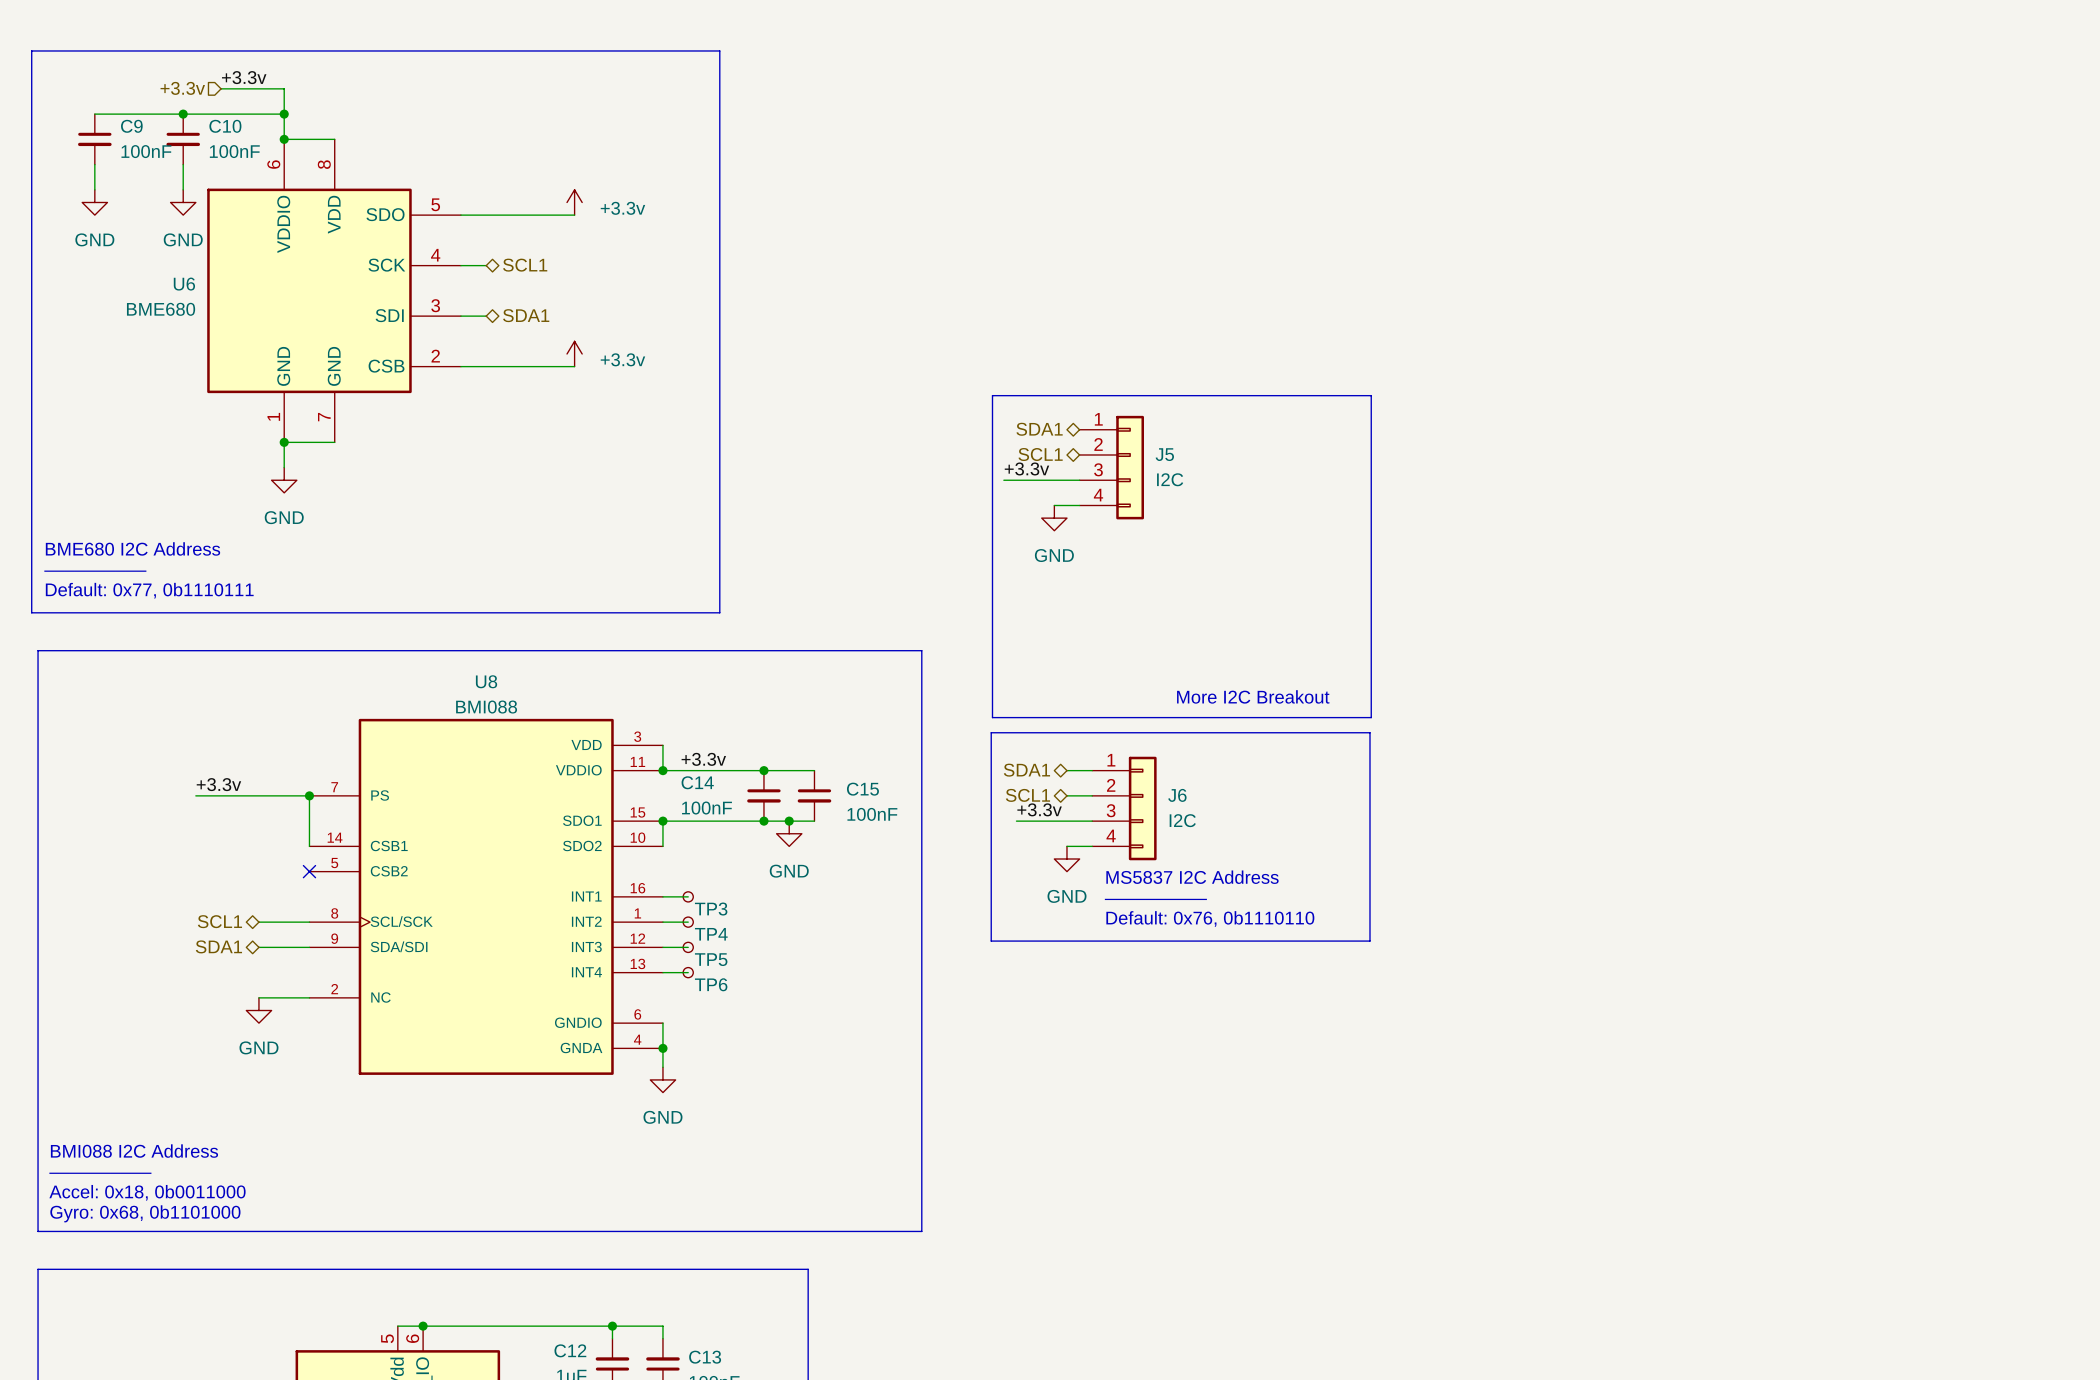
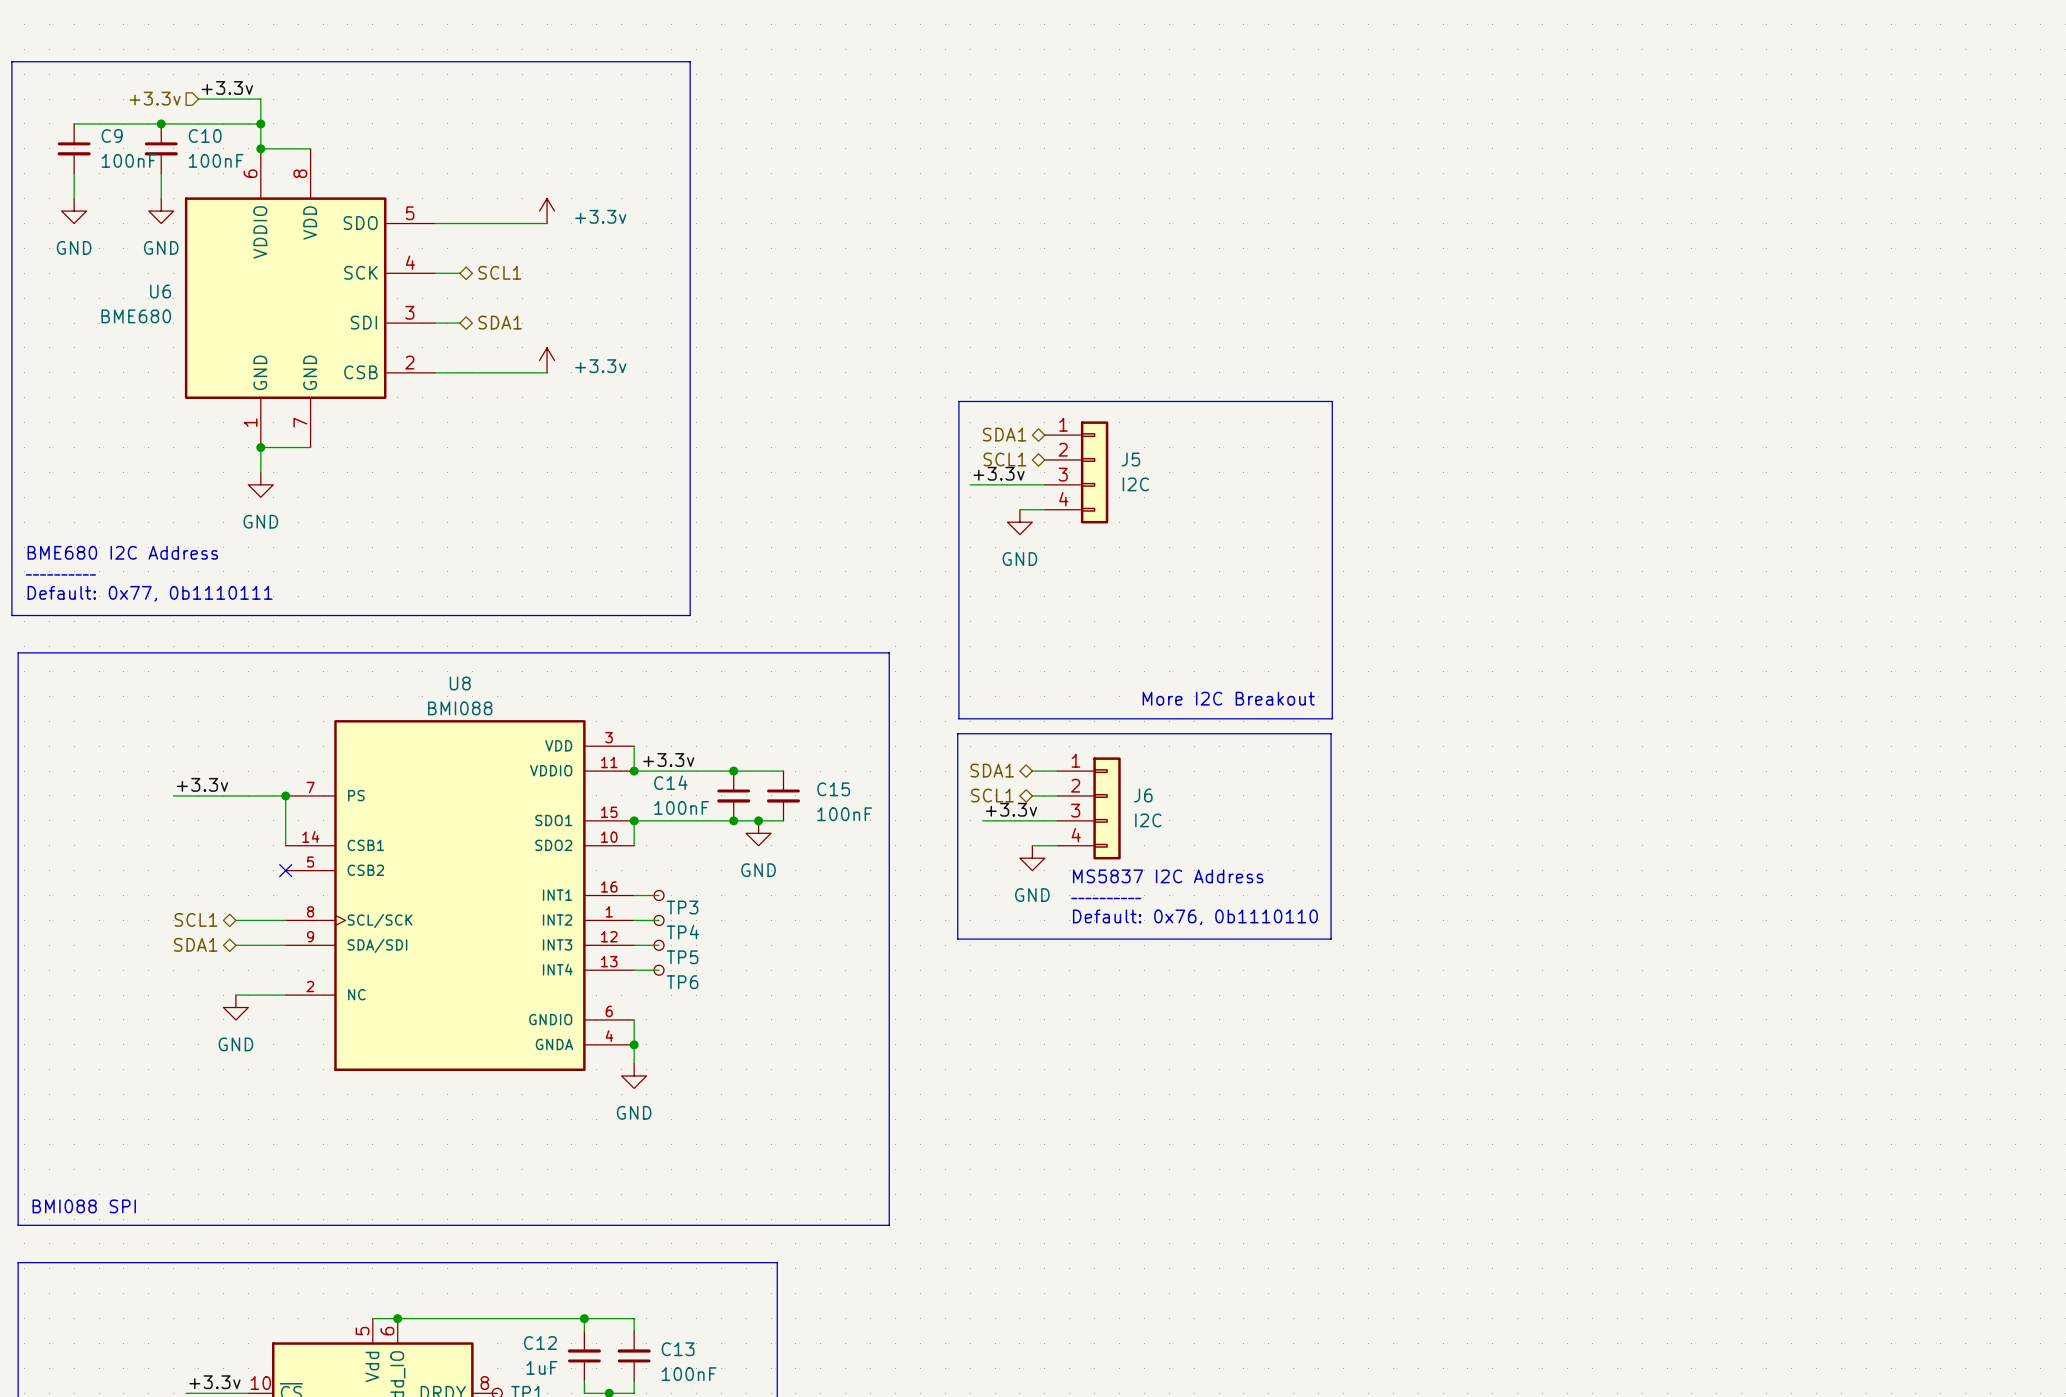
text: BMI088 I2C Address (134, 1151) -> none
text: –––––––––– (100, 1173) -> none
text: Accel: 0x18, 0b0011000 (147, 1192) -> none
text: Gyro: 0x68, 0b1101000 (145, 1213) -> BMI088 SPI (84, 1206)

